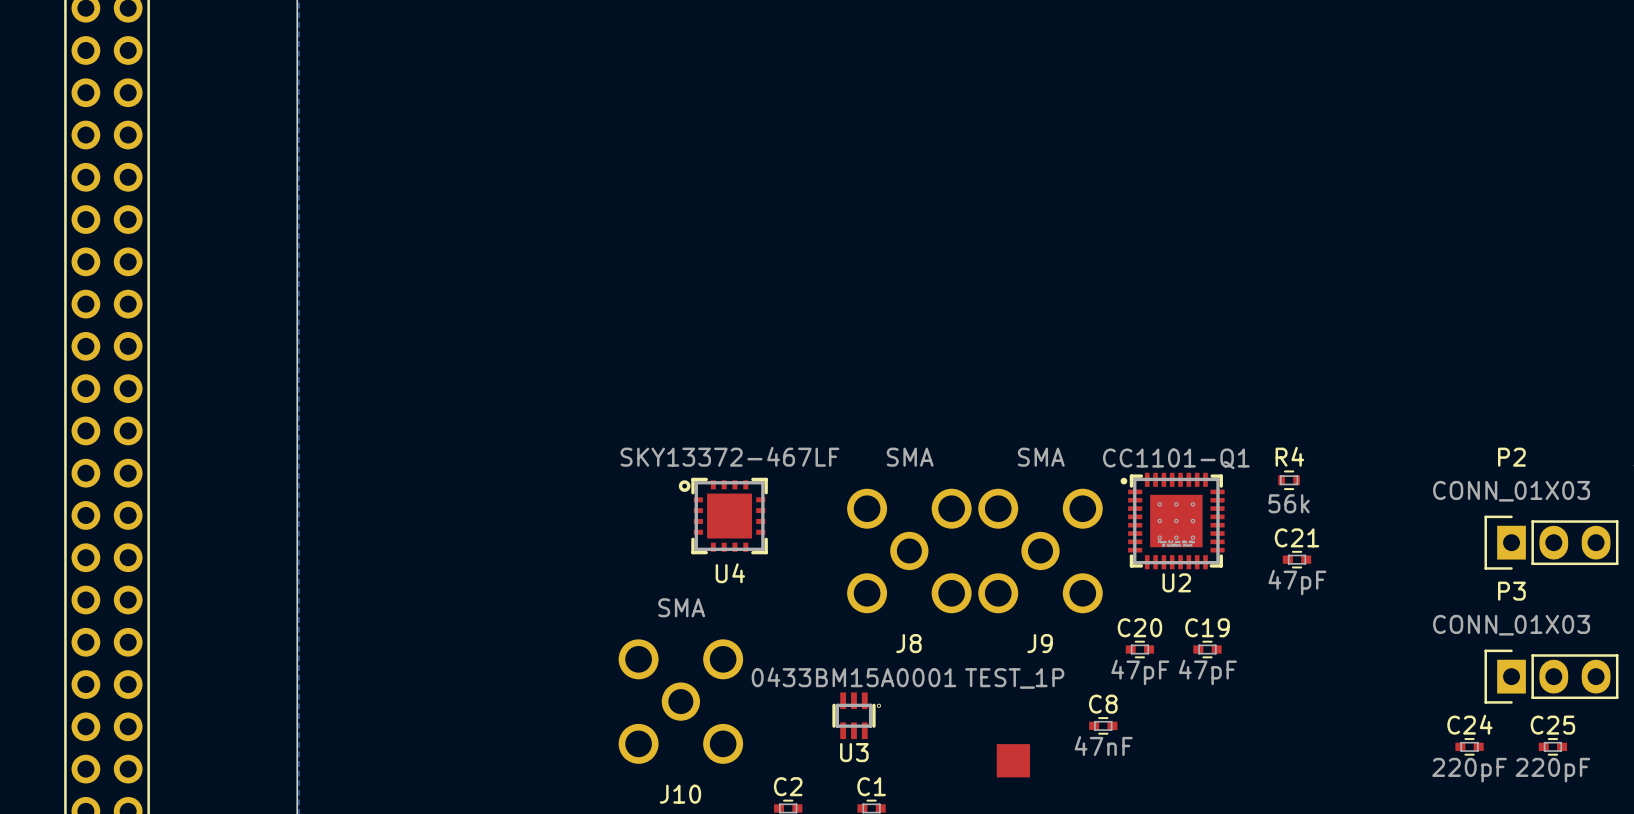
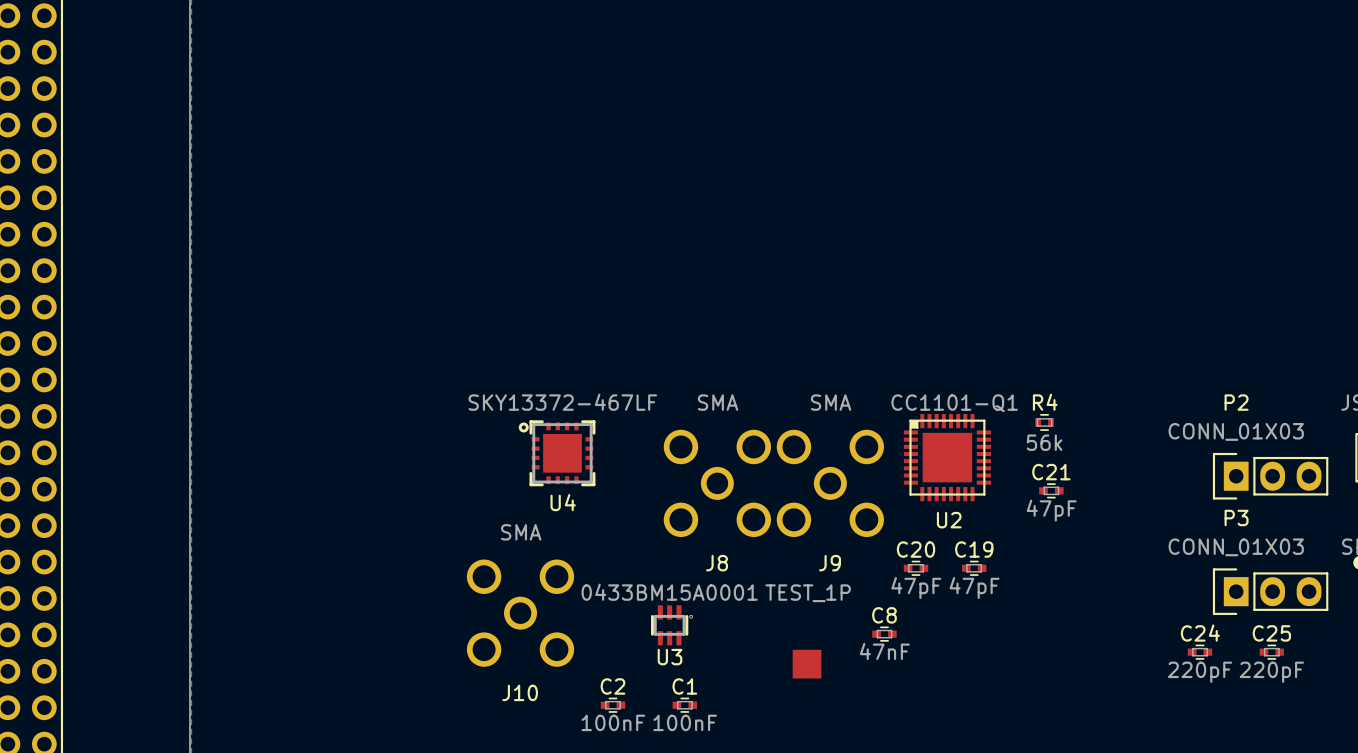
U2 footprint: [1120, 472, 1225, 570] -> [903, 414, 992, 502]

